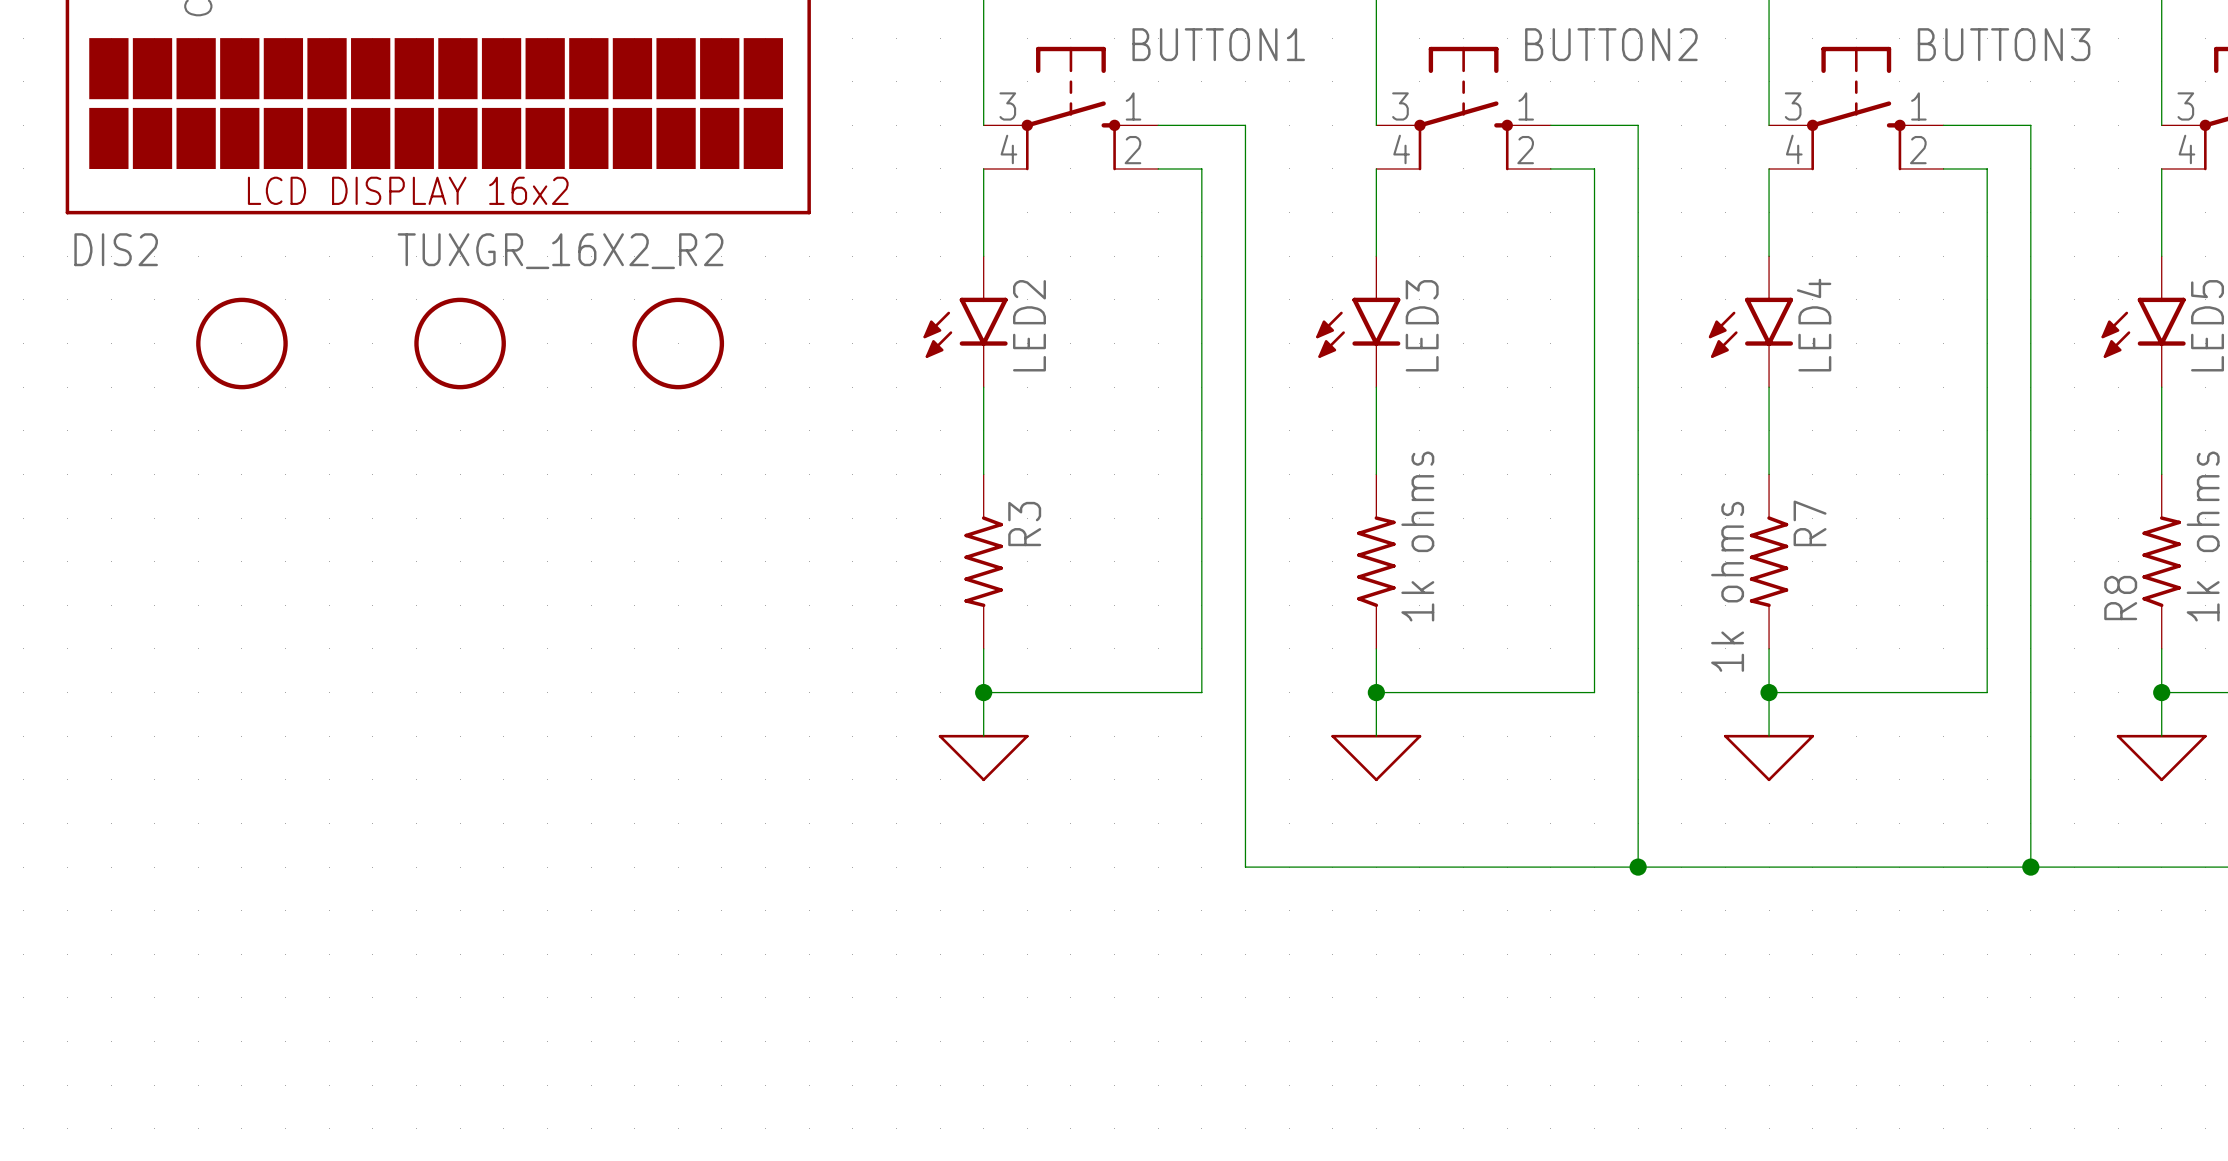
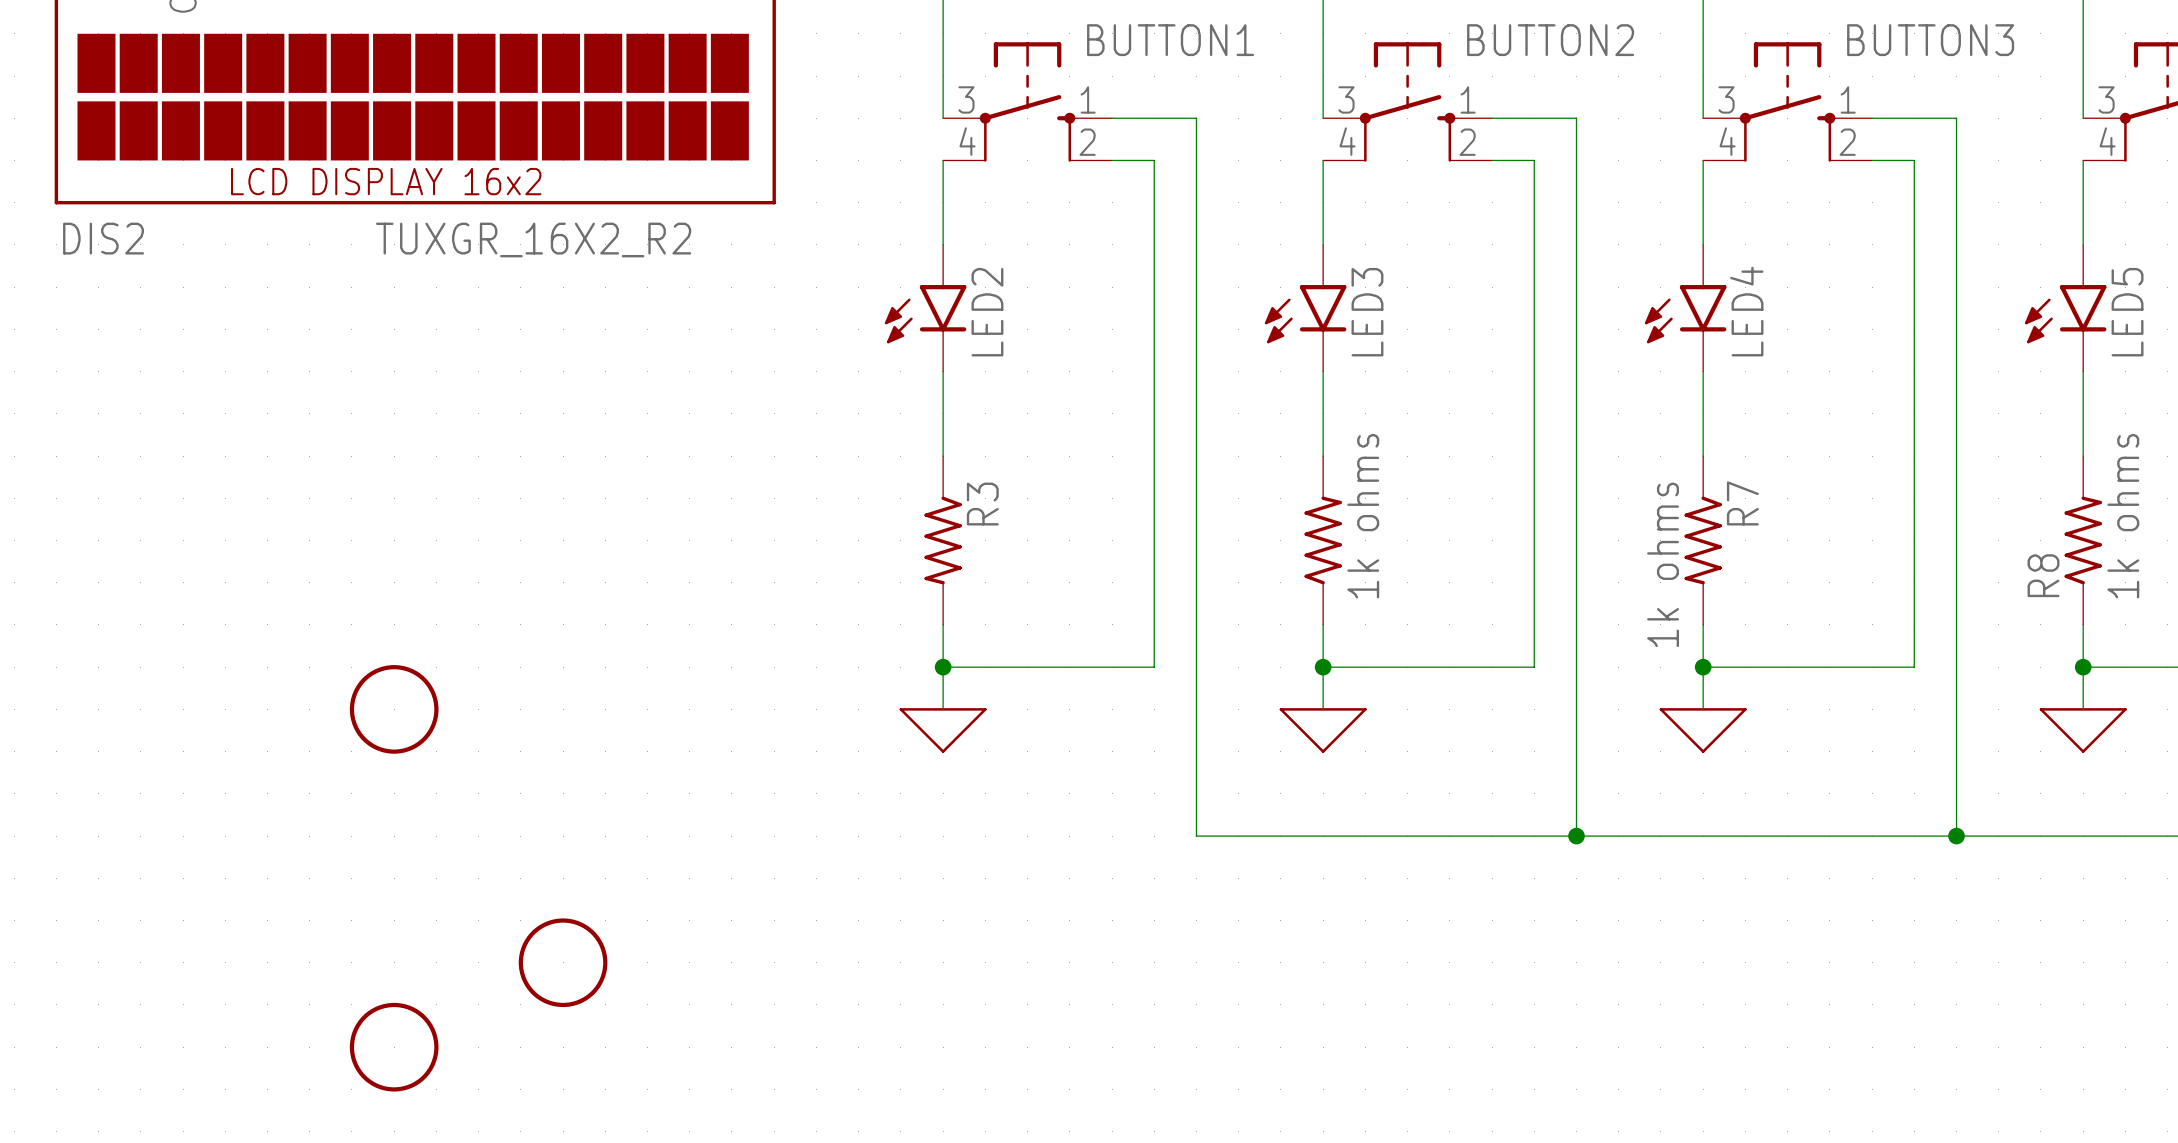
part: (241, 343) -> none
part: (460, 343) -> none
part: (678, 343) -> none
part: none -> (394, 709)
part: none -> (563, 962)
part: none -> (394, 1047)

